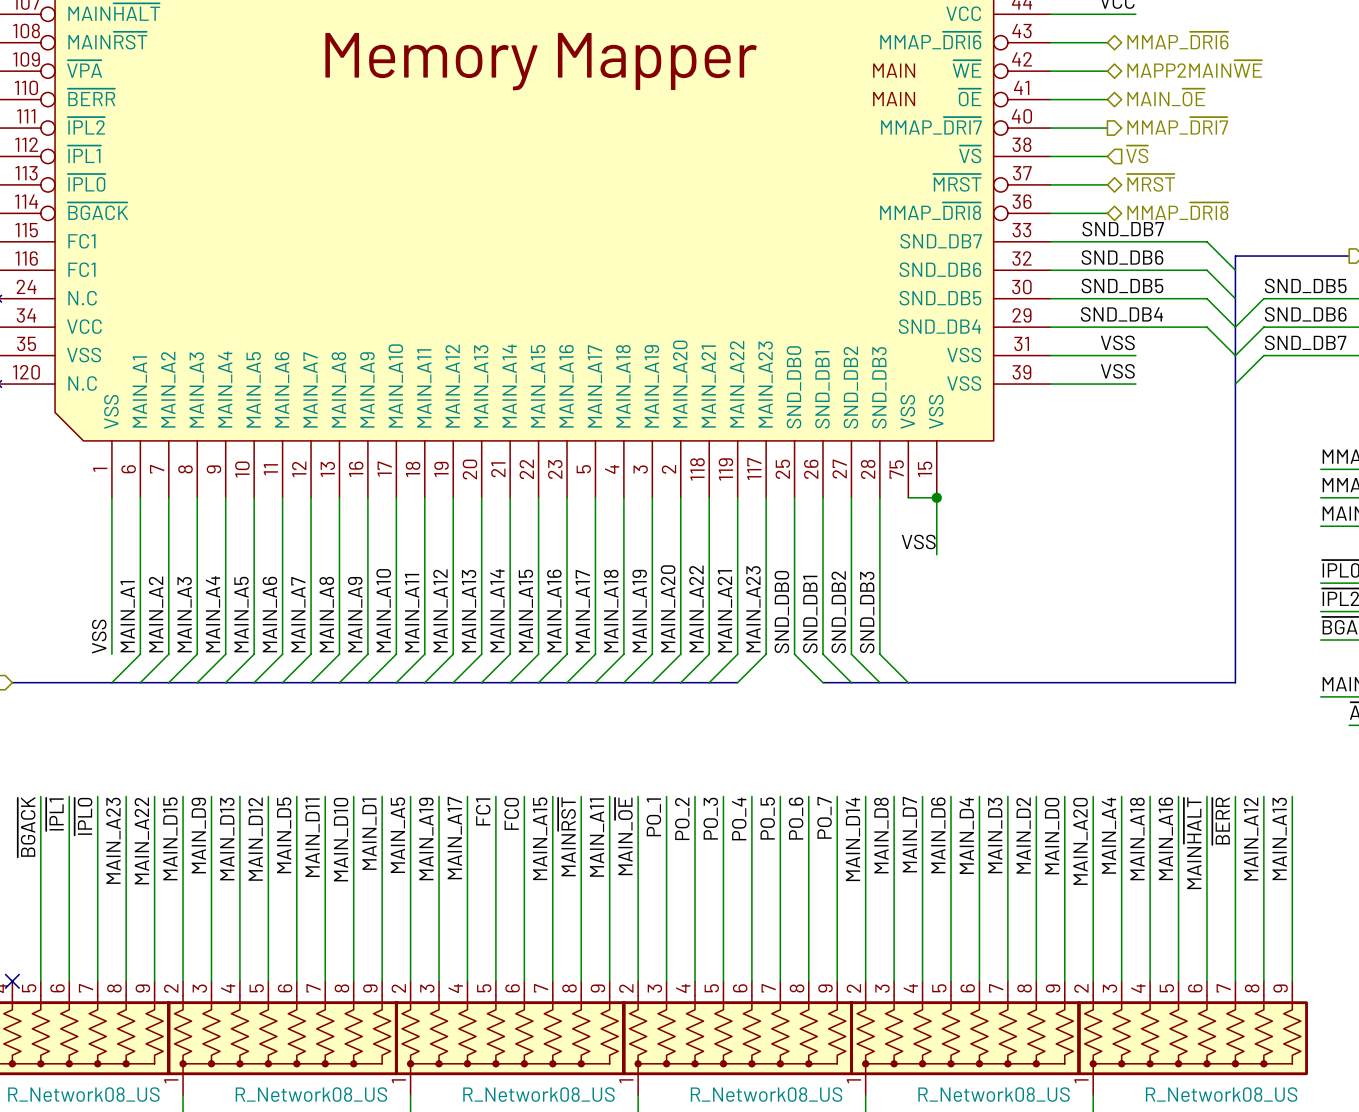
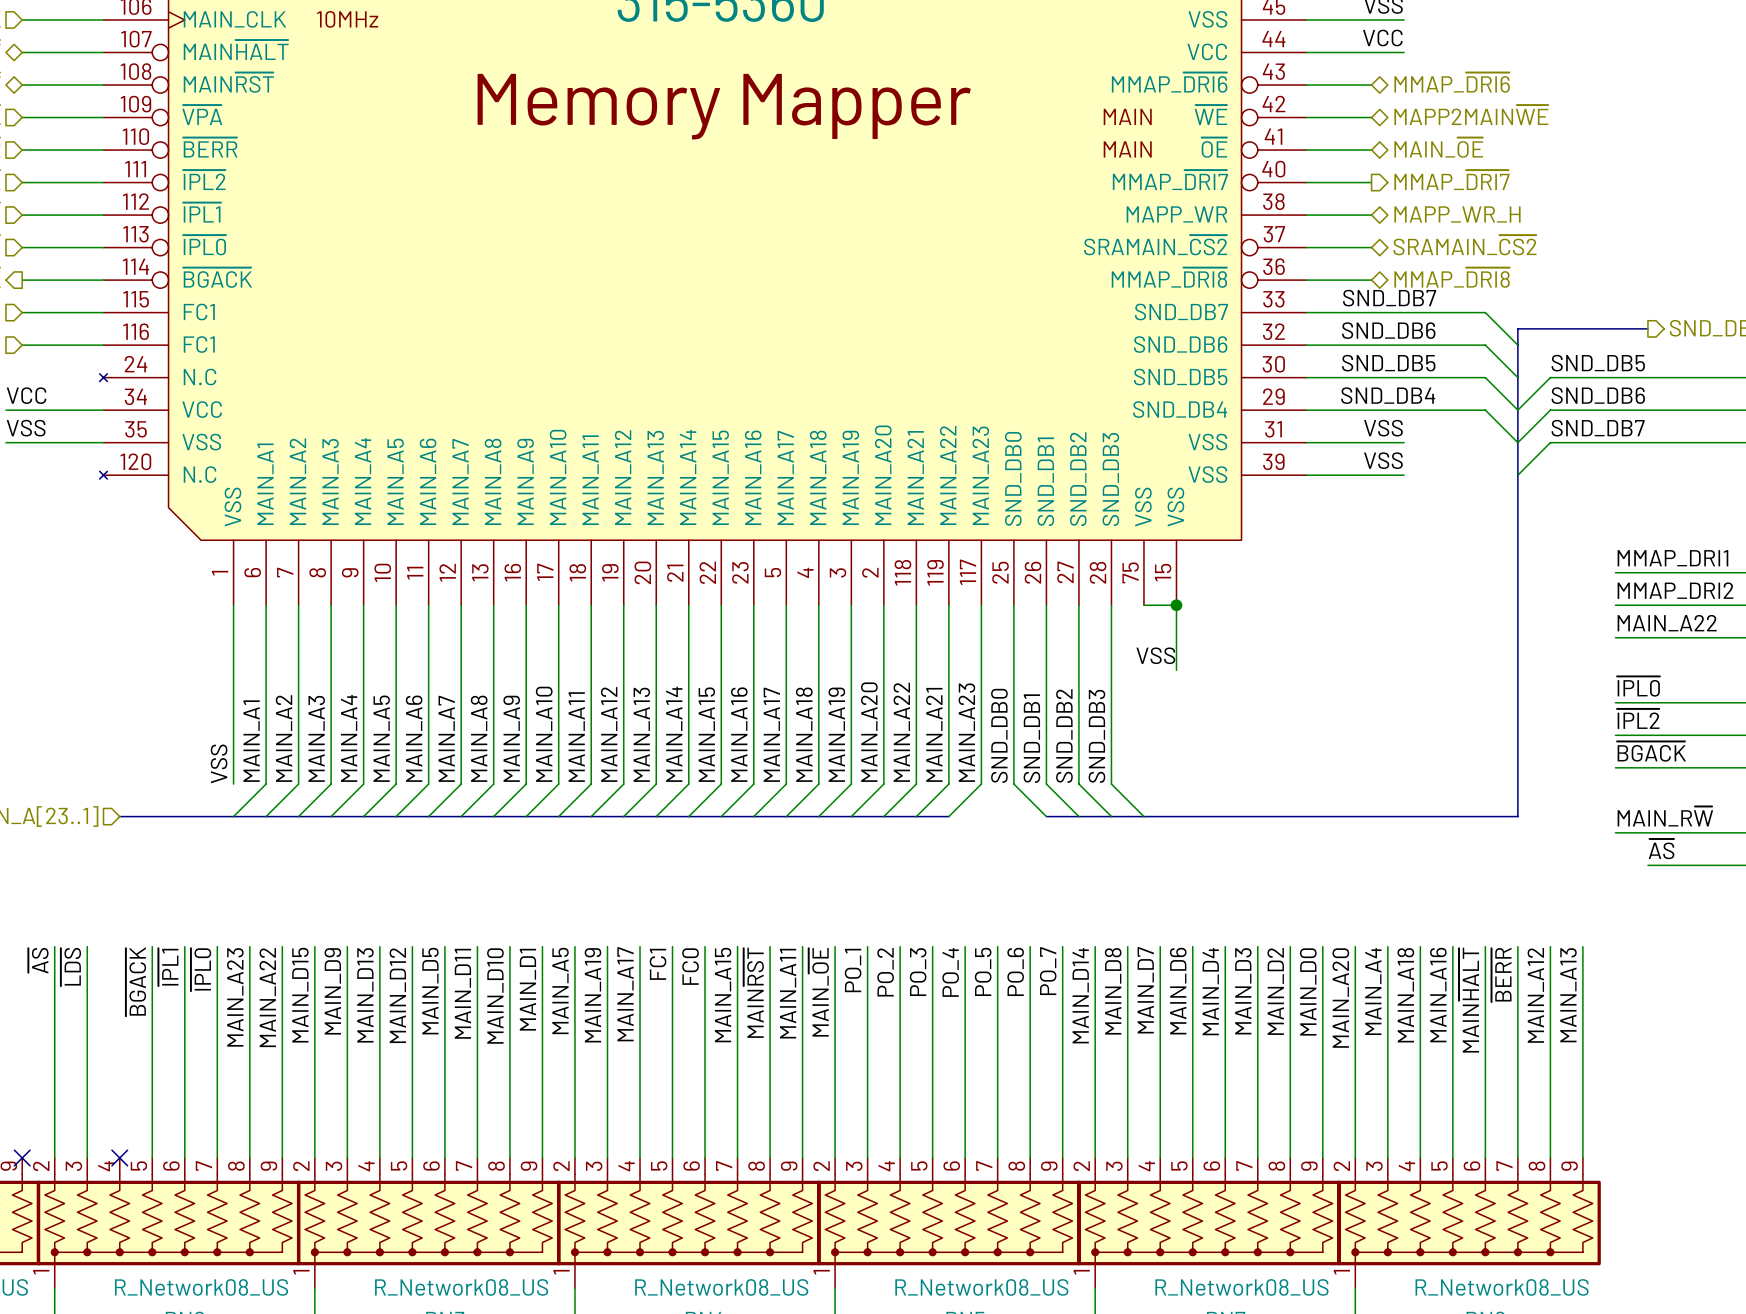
part pin name: ~{VS} (970, 154) -> MAPP_WR (1177, 214)
hierarchical label shape: input (1137, 154) -> bidirectional (1457, 214)
hierarchical label: ~{VS} (1137, 154) -> MAPP_WR_H (1457, 214)
part pin name: ~{MRST} (957, 182) -> SRAMAIN_~{CS2} (1155, 245)
hierarchical label: ~{MRST} (1150, 182) -> SRAMAIN_~{CS2} (1464, 245)

